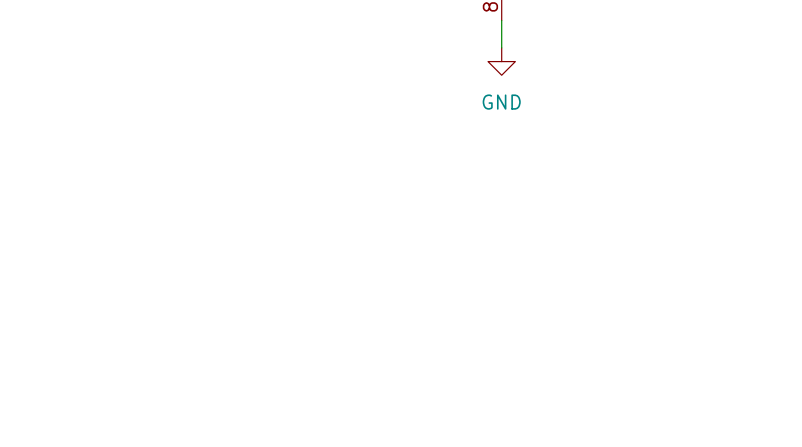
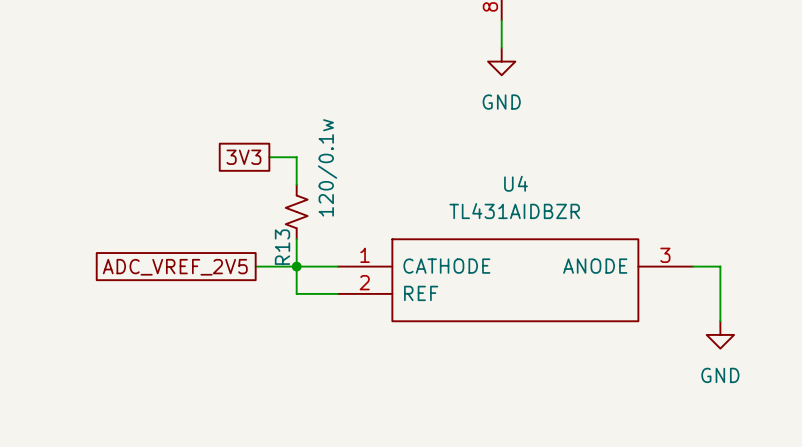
global label: none -> 3V3 (243, 157)
wire: none -> (269, 157) (296, 157) (296, 184)
R13: none -> 120/0.1w (296, 211)
wire: none -> (296, 239) (296, 293) (337, 293)
wire: none -> (255, 266) (337, 266)
junction: none -> (296, 266)
wire: none -> (693, 266) (720, 266) (720, 321)
global label: none -> ADC_VREF_2V5 (175, 267)
U4: none -> TL431AIDBZR (515, 280)
power symbol: none -> GND (720, 334)

